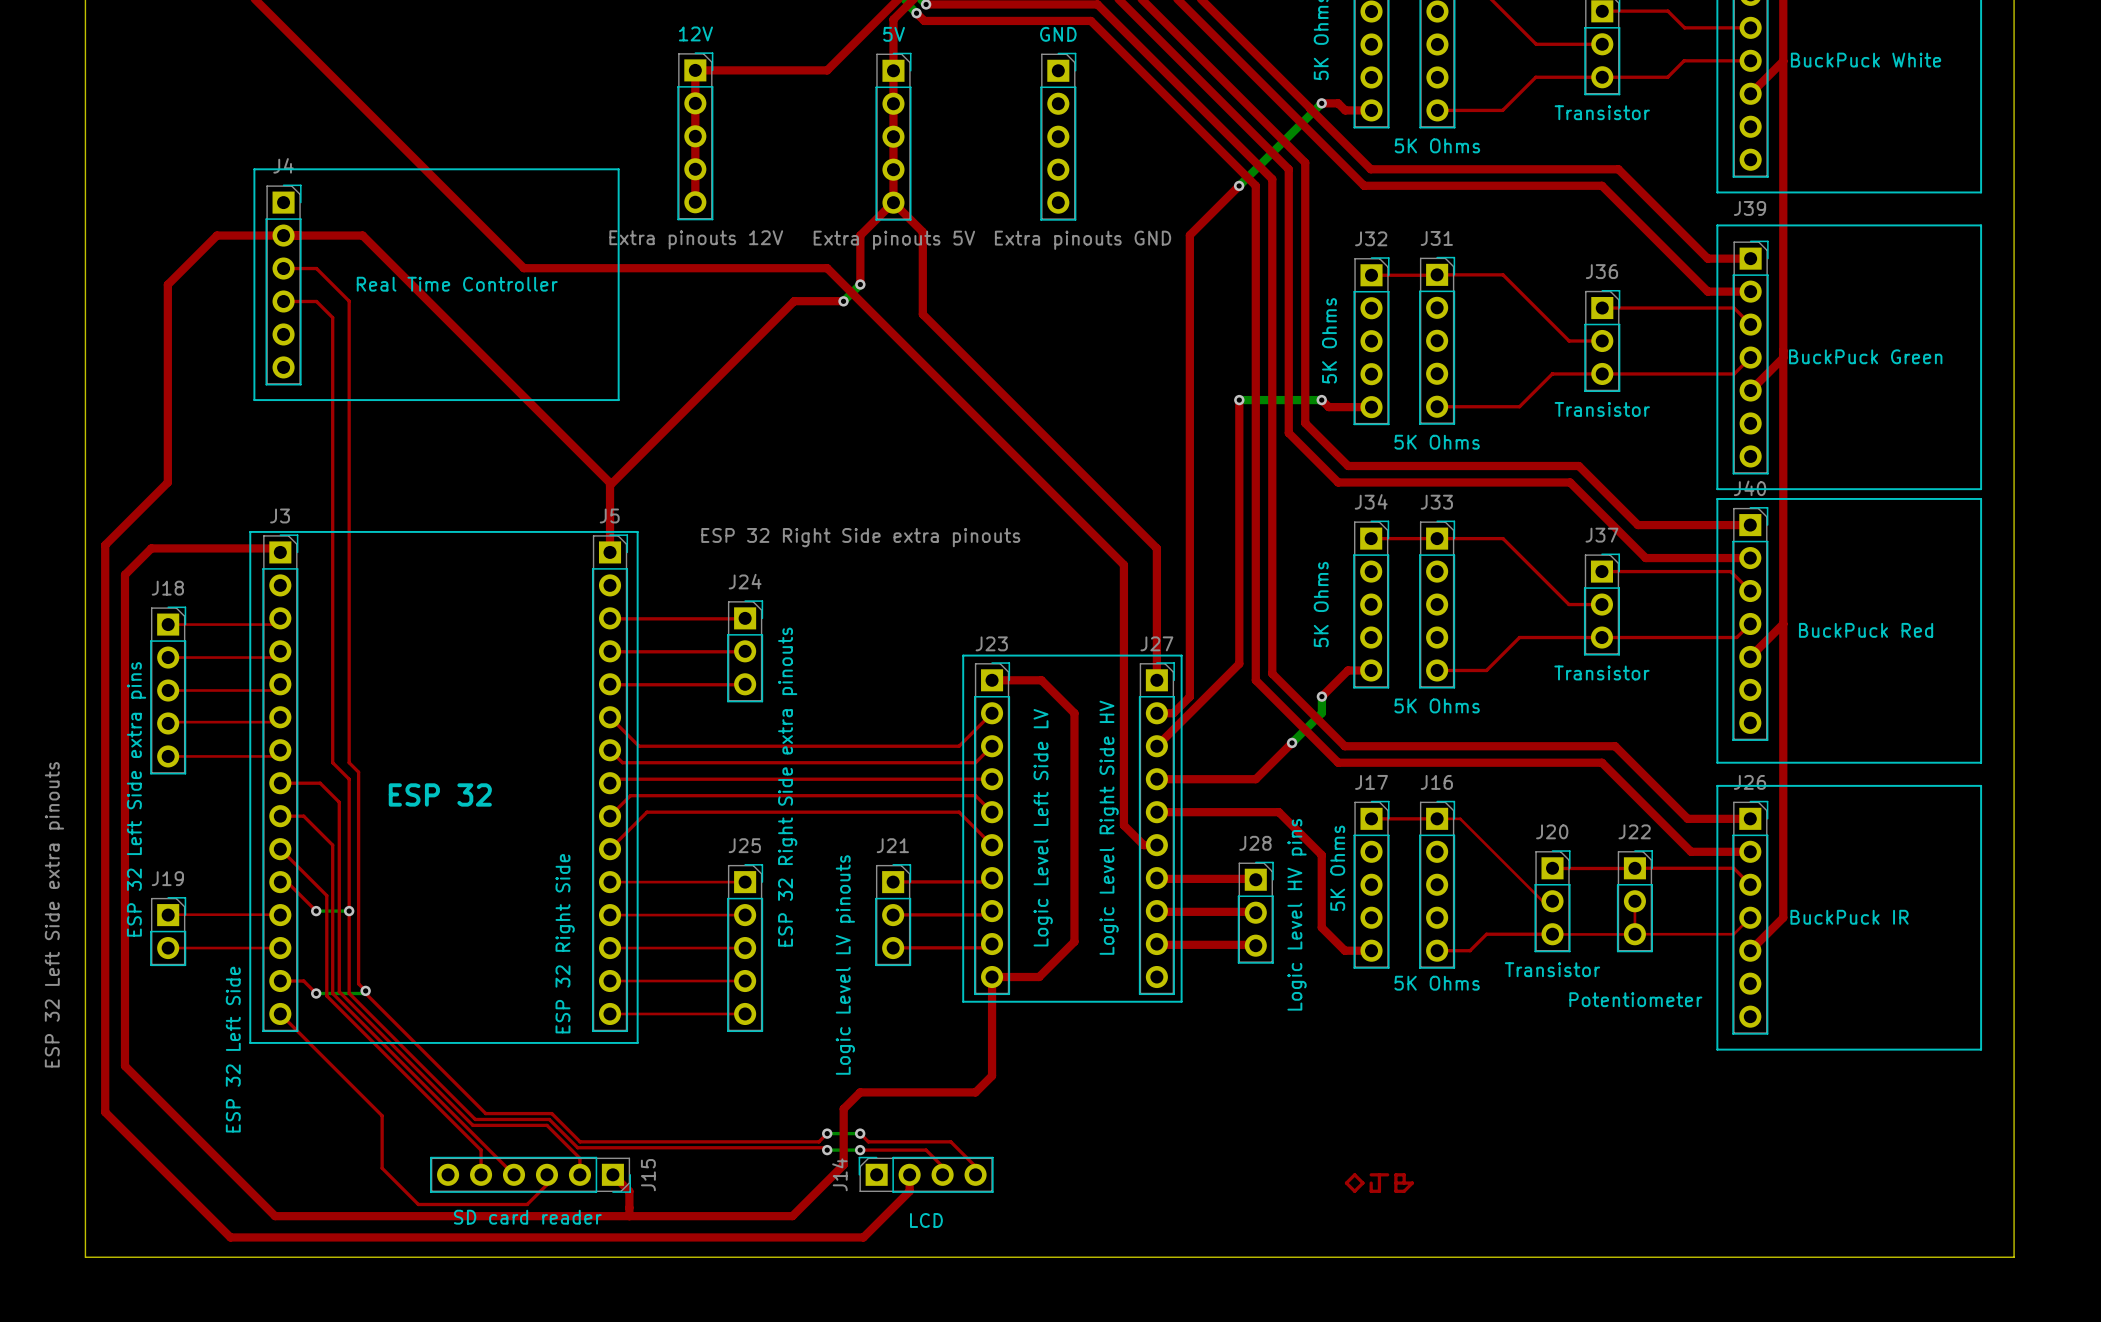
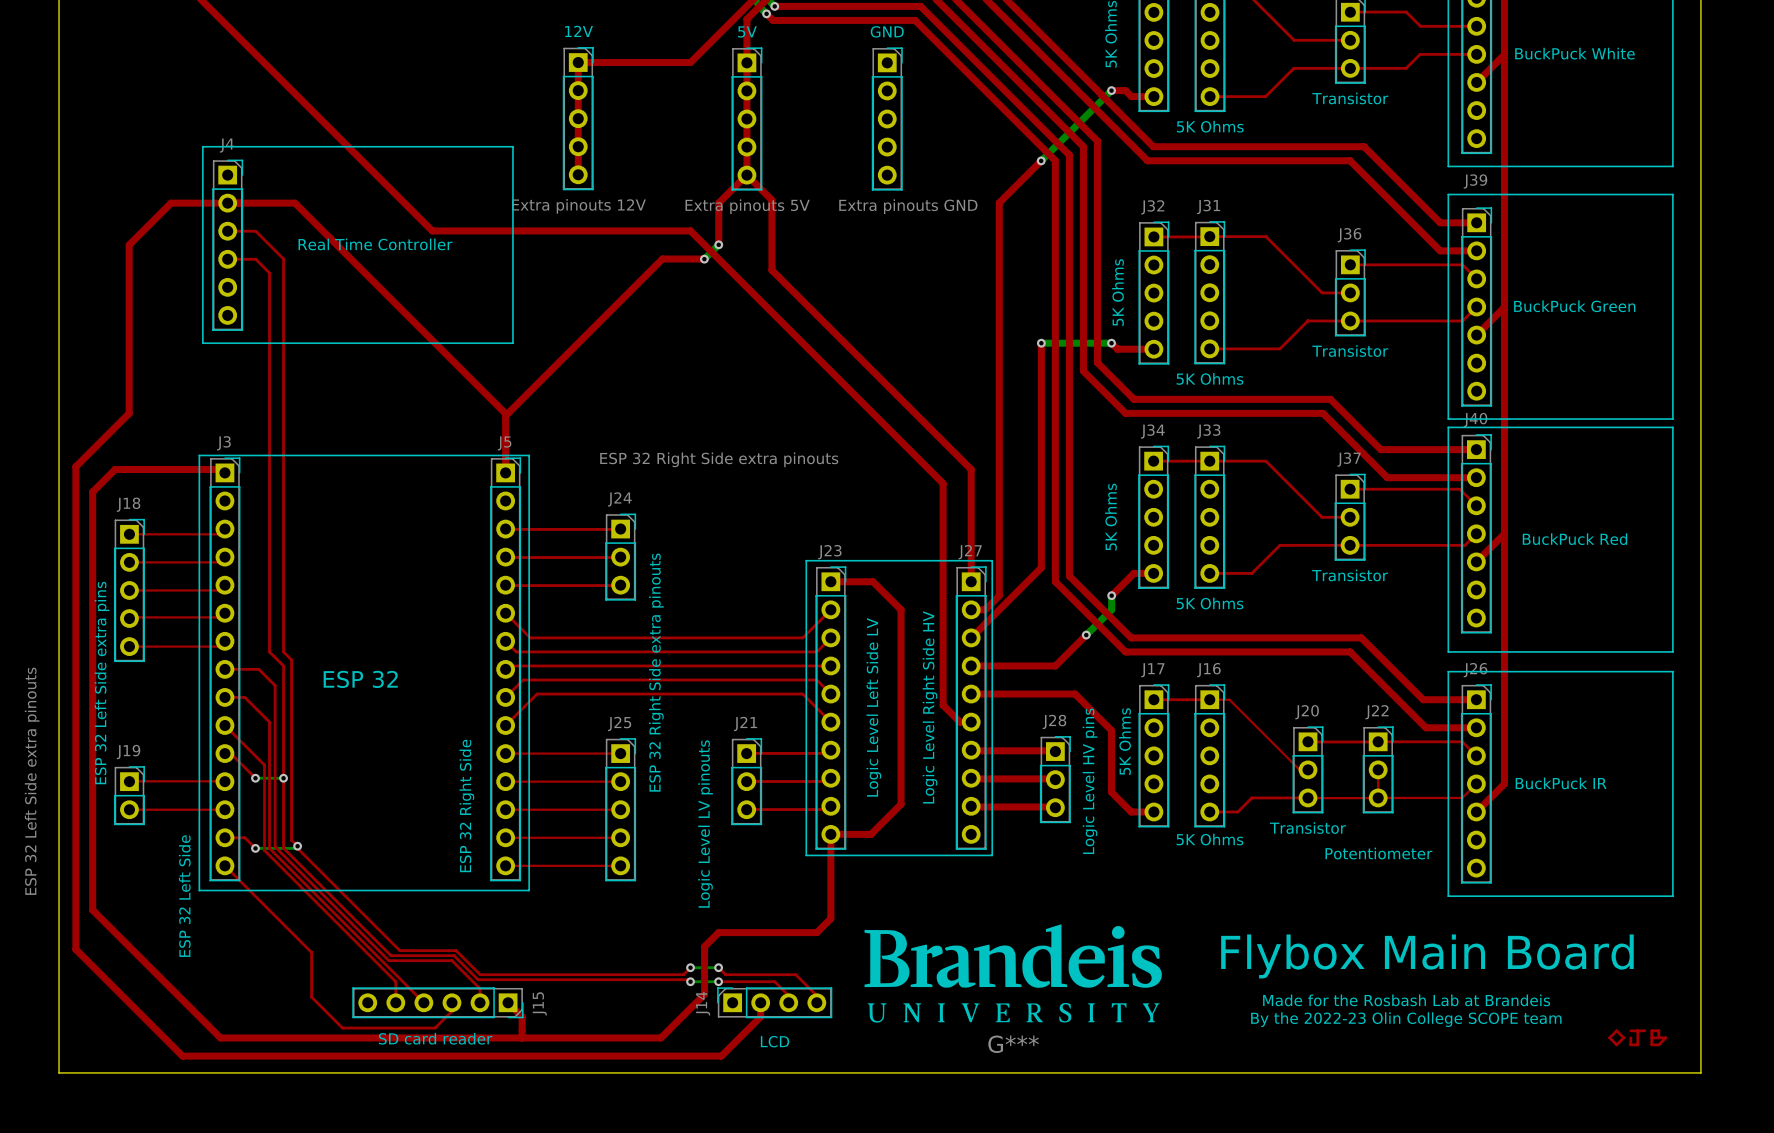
text: none -> Flybox Main Board (1427, 956)
G***: none -> (1013, 973)
text: none -> Made for the Rosbash Lab at Brandeis (1406, 1000)
top track: (1354, 1174) (1346, 1183) (1354, 1191) (1362, 1183) (1354, 1174) -> none
top track: (1371, 1174) (1387, 1174) -> none
top track: (1379, 1174) (1379, 1191) (1371, 1191) (1371, 1183) -> none
top track: (1395, 1183) (1412, 1183) (1404, 1191) (1395, 1191) (1395, 1174) (1404, 1174) (1404, 1183) -> none
text: none -> By the 2022-23 Olin College SCOPE team (1406, 1019)
top track: none -> (1616, 1030) (1609, 1037) (1616, 1044) (1623, 1037) (1616, 1030)
top track: none -> (1630, 1030) (1644, 1030)
top track: none -> (1637, 1030) (1637, 1044) (1630, 1044) (1630, 1037)
top track: none -> (1651, 1037) (1665, 1037) (1658, 1044) (1651, 1044) (1651, 1030) (1658, 1030) (1658, 1037)

